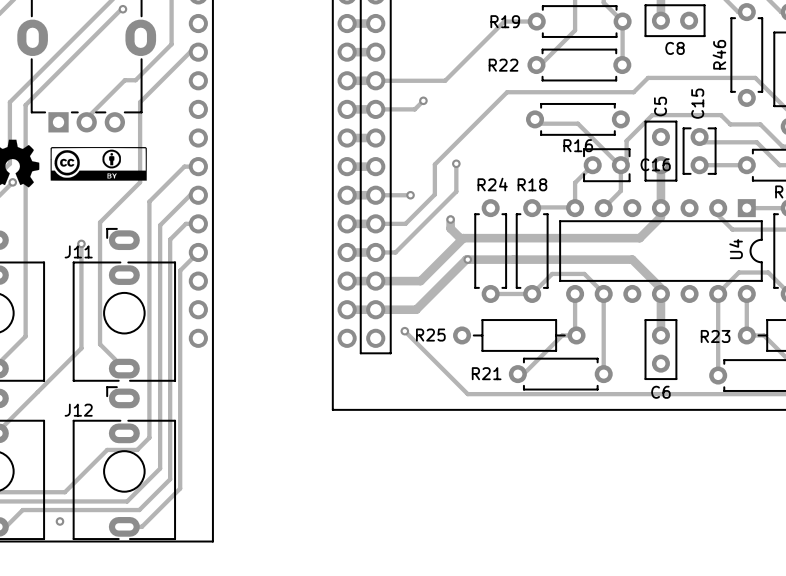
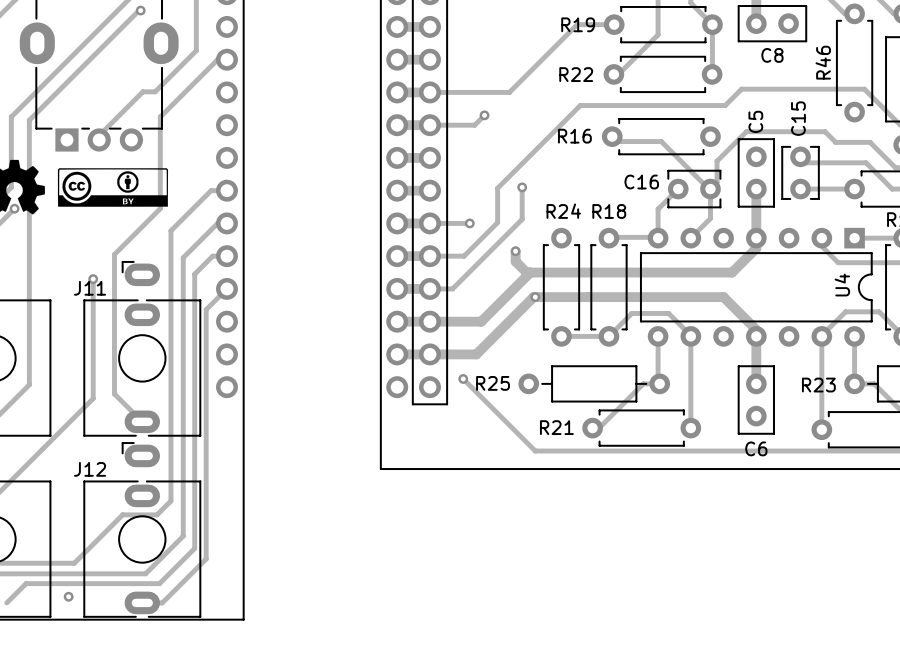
R16 name position: R16 (578, 145) -> R16 (574, 136)
C16 name position: C16 (655, 164) -> C16 (641, 182)

